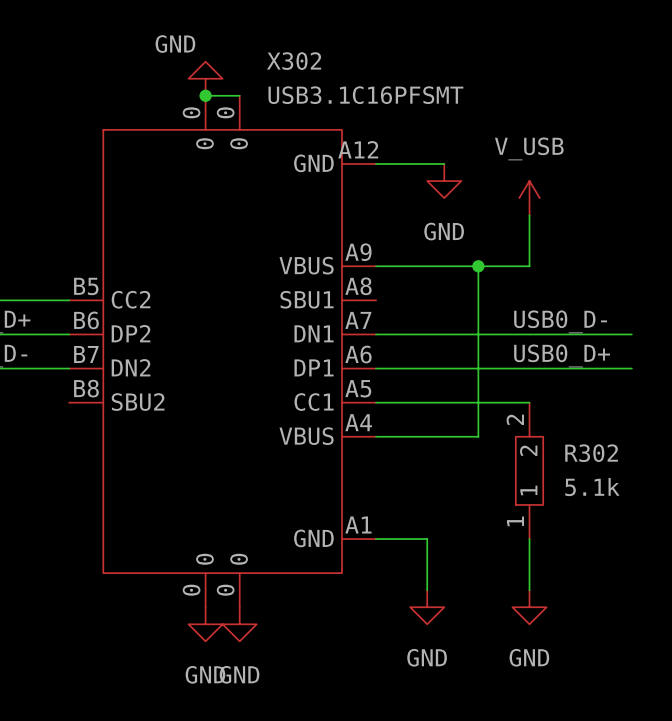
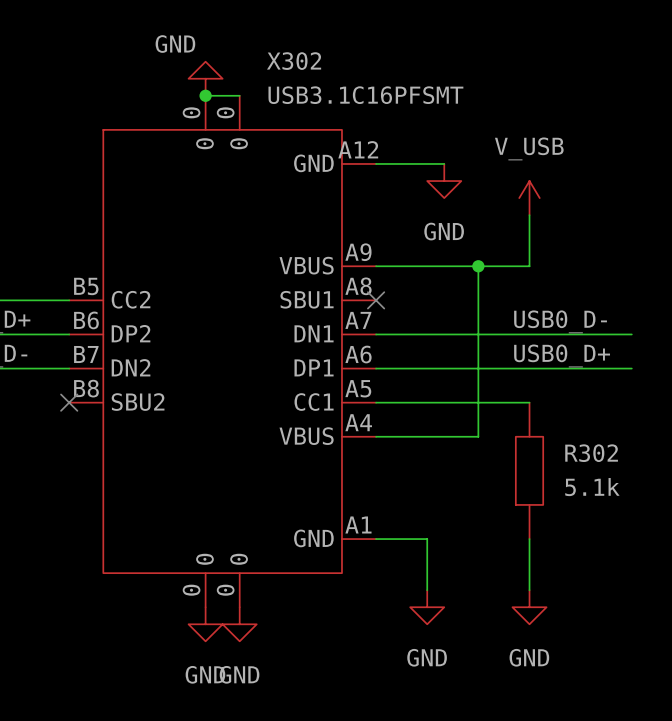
no-connect mark: none -> (376, 300)
no-connect mark: none -> (69, 402)
R302 pin number: 2 (515, 419) -> none
R302 pin name: 2 (528, 450) -> none
R302 pin name: 1 (528, 490) -> none
R302 pin number: 1 (515, 521) -> none

